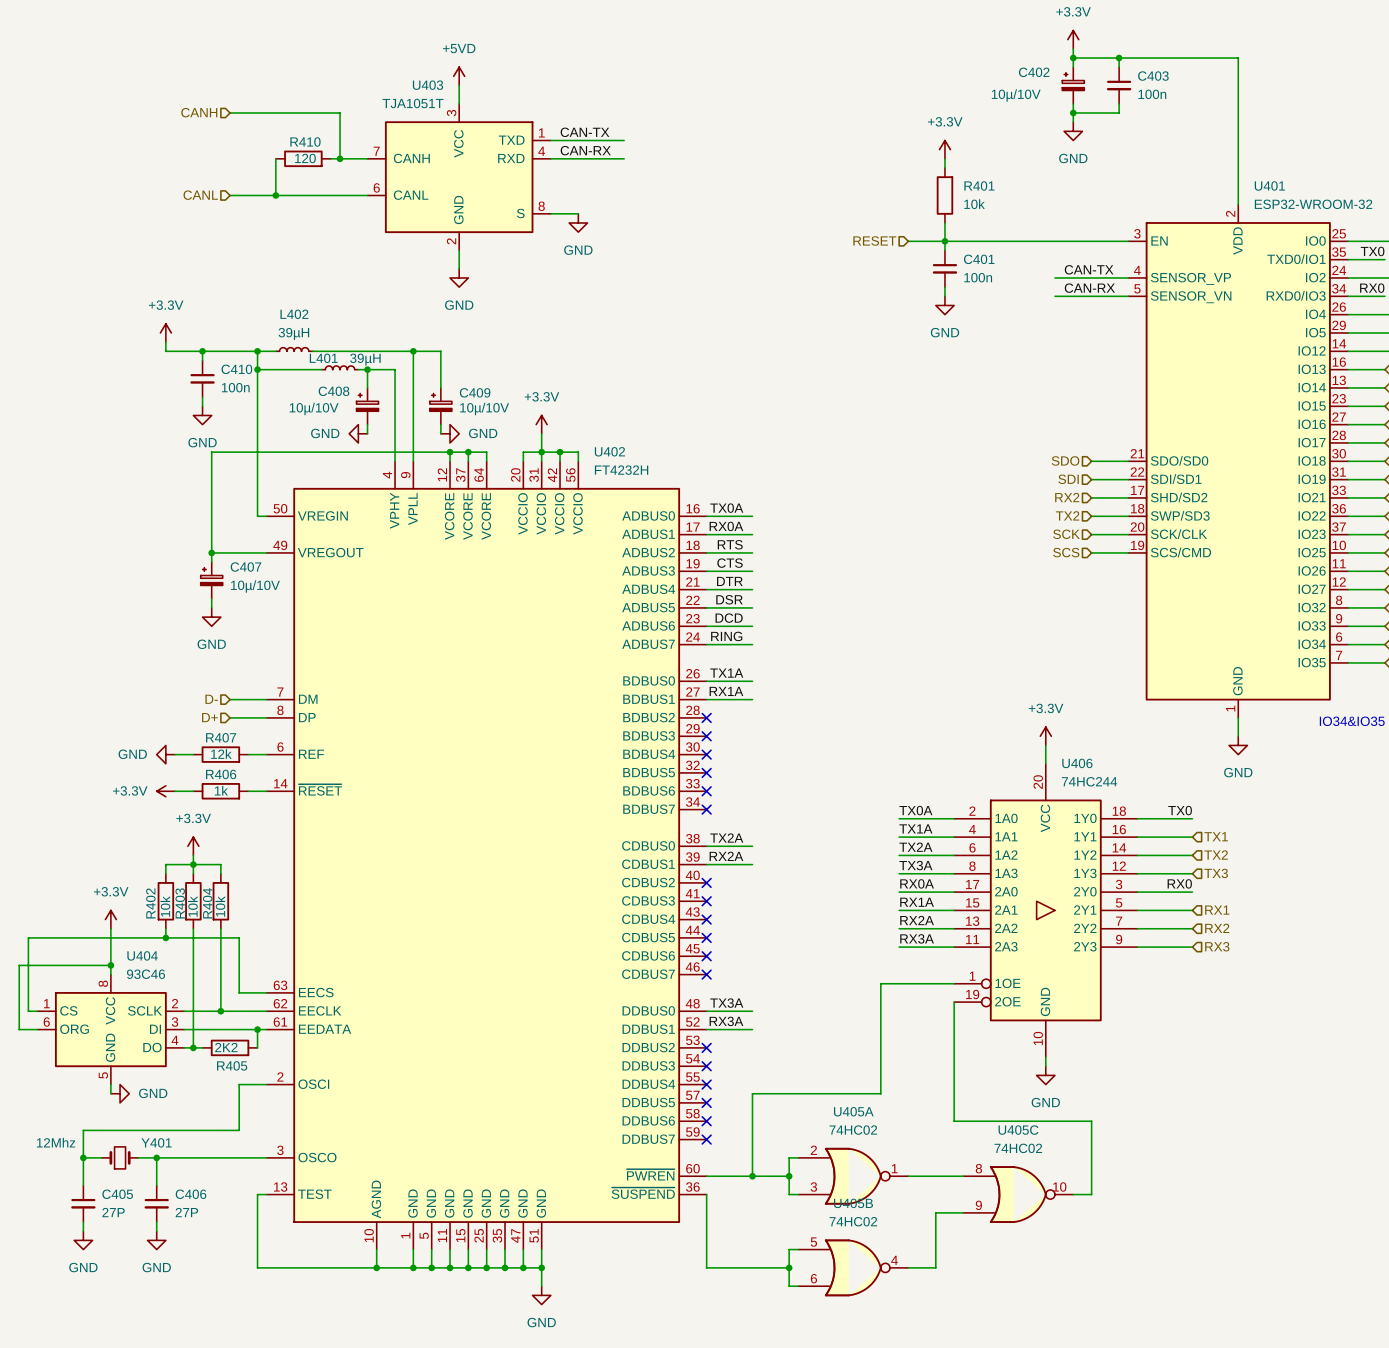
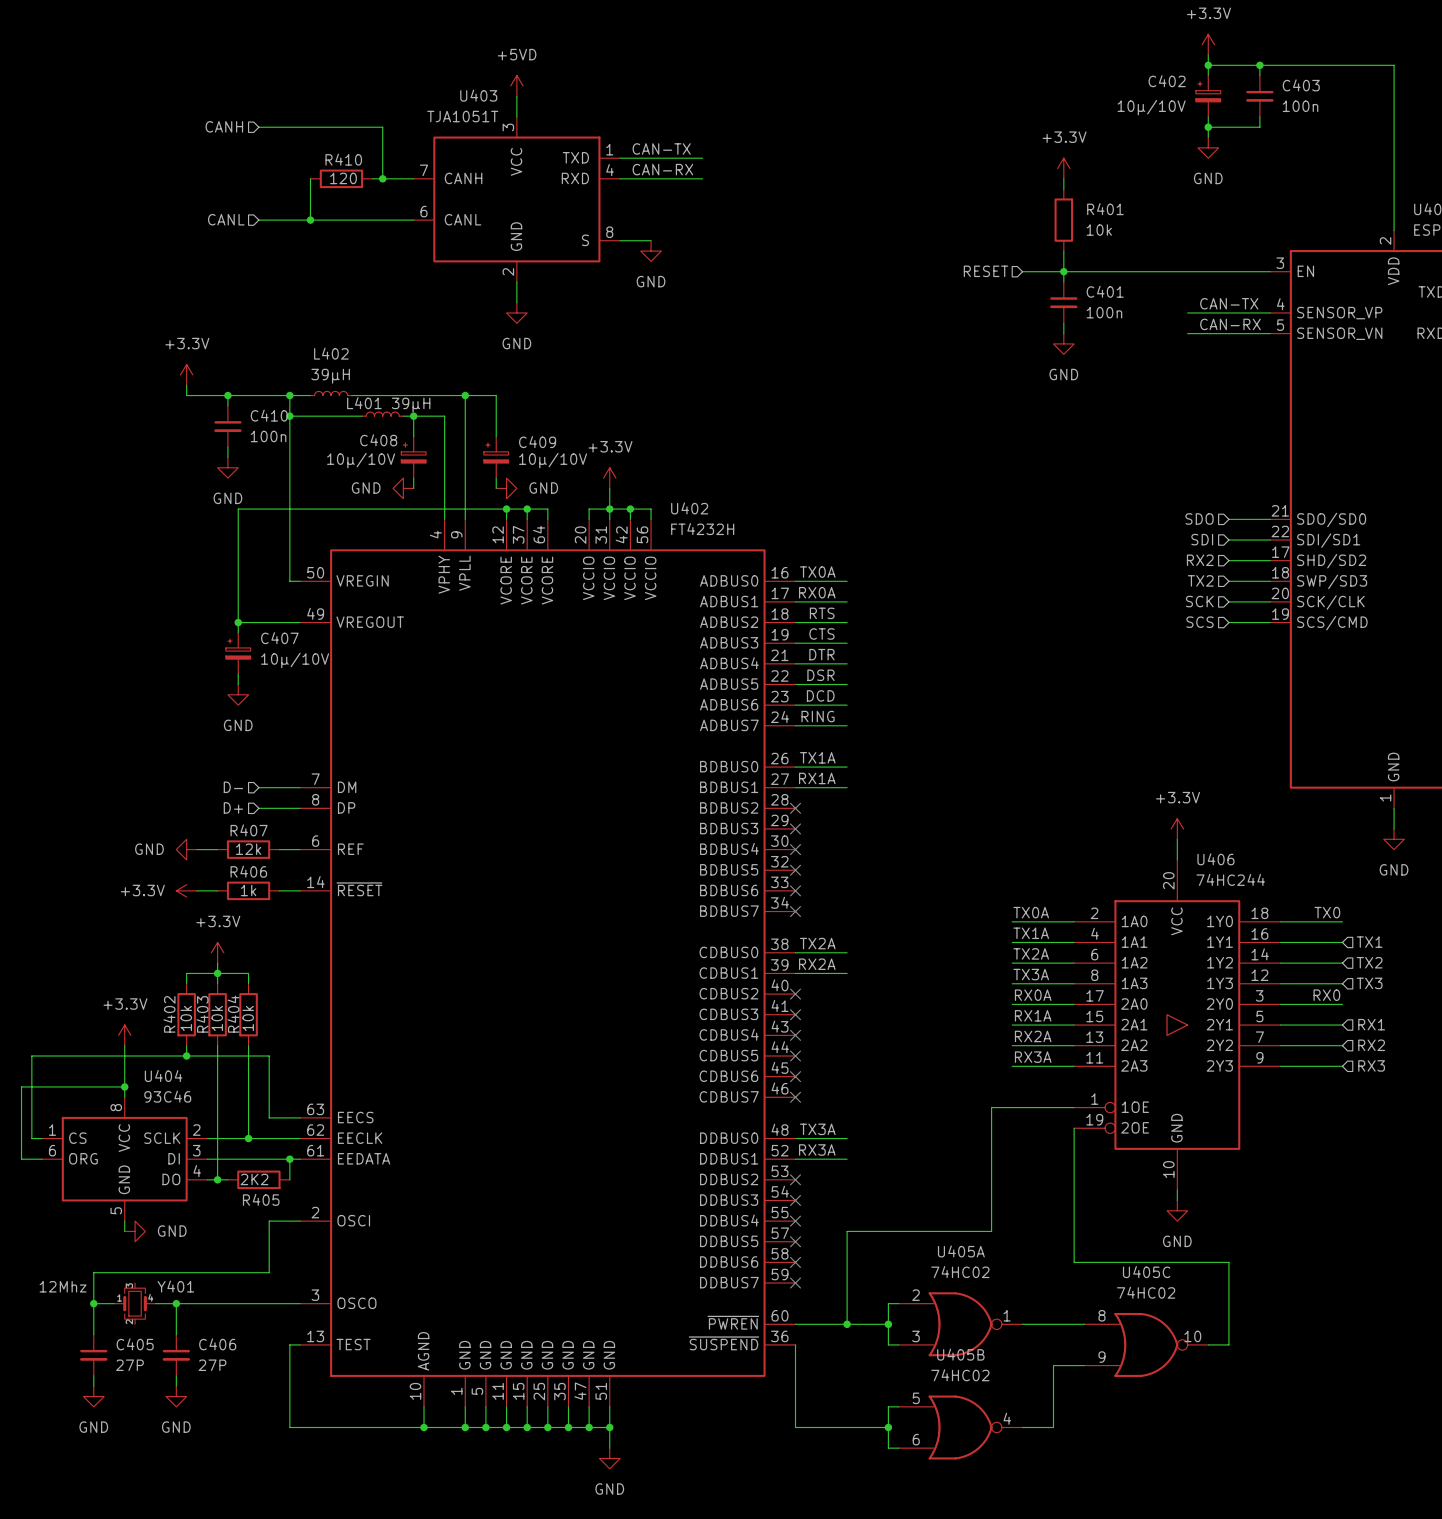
Y401 symbol: [101, 1146, 139, 1169] -> [114, 1283, 156, 1325]

